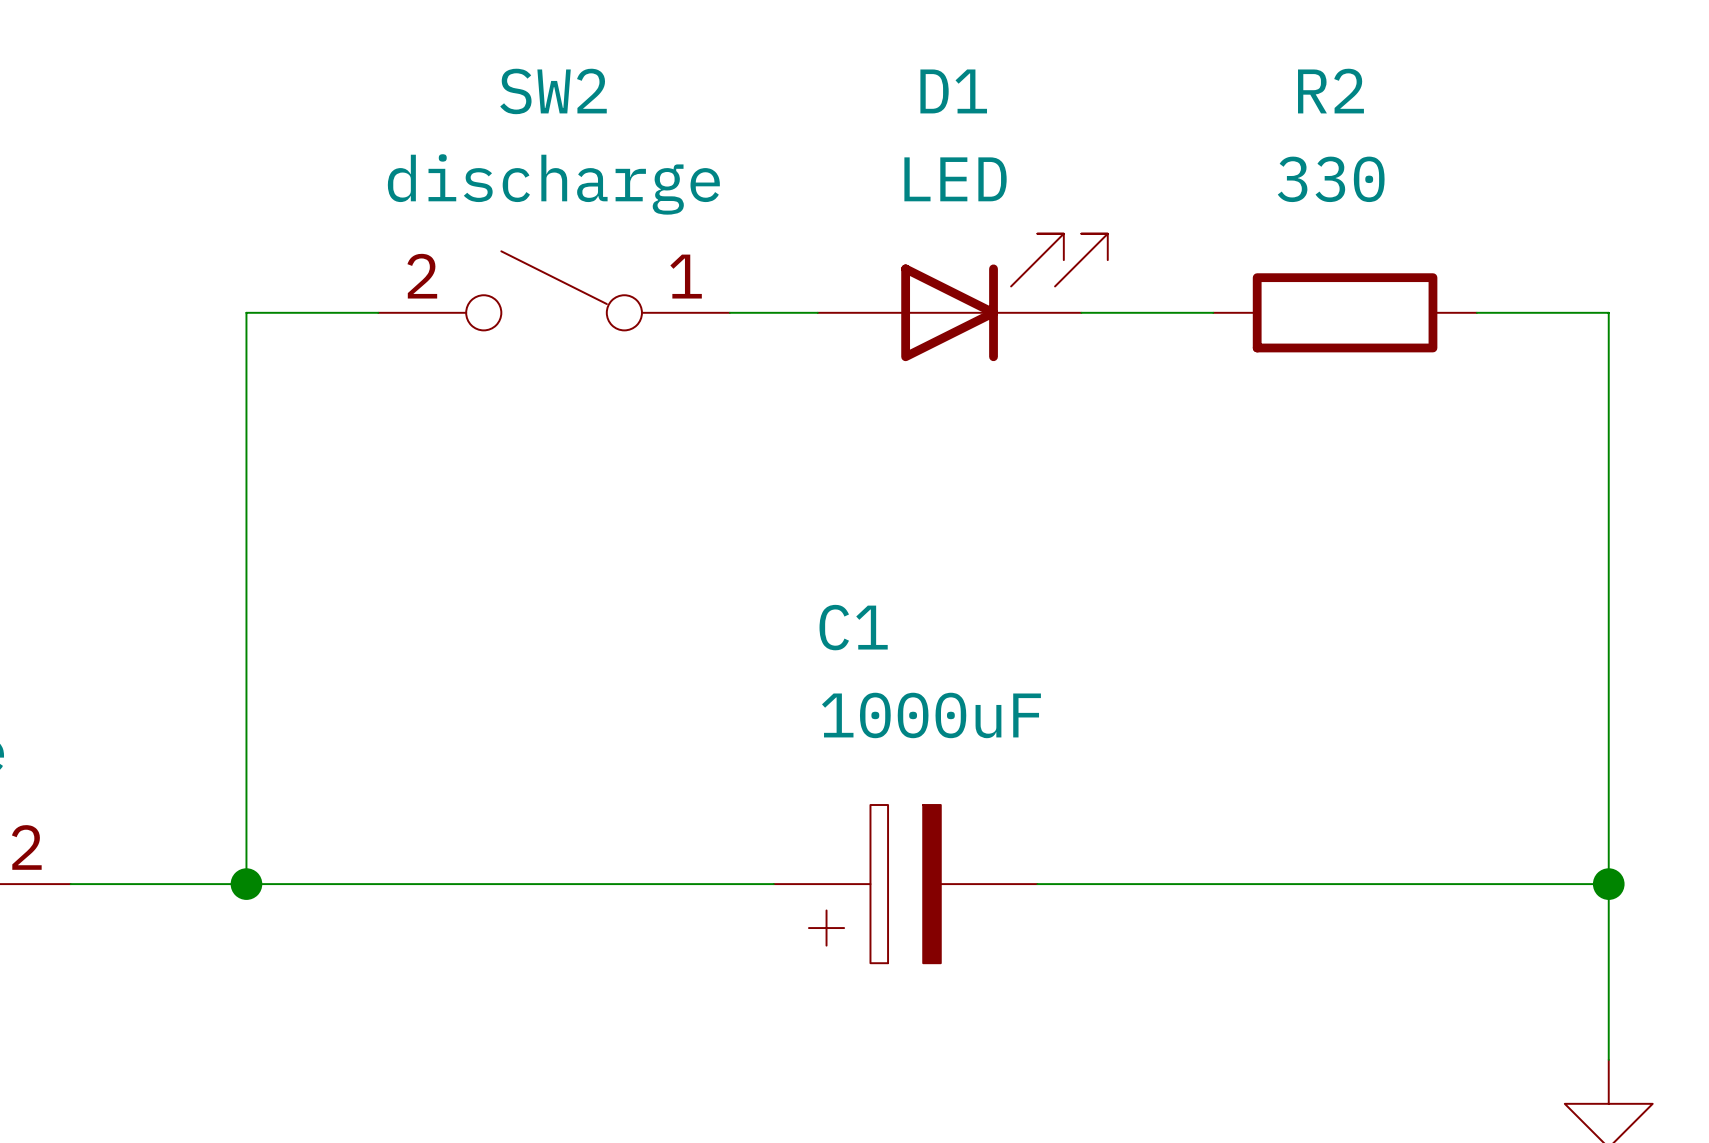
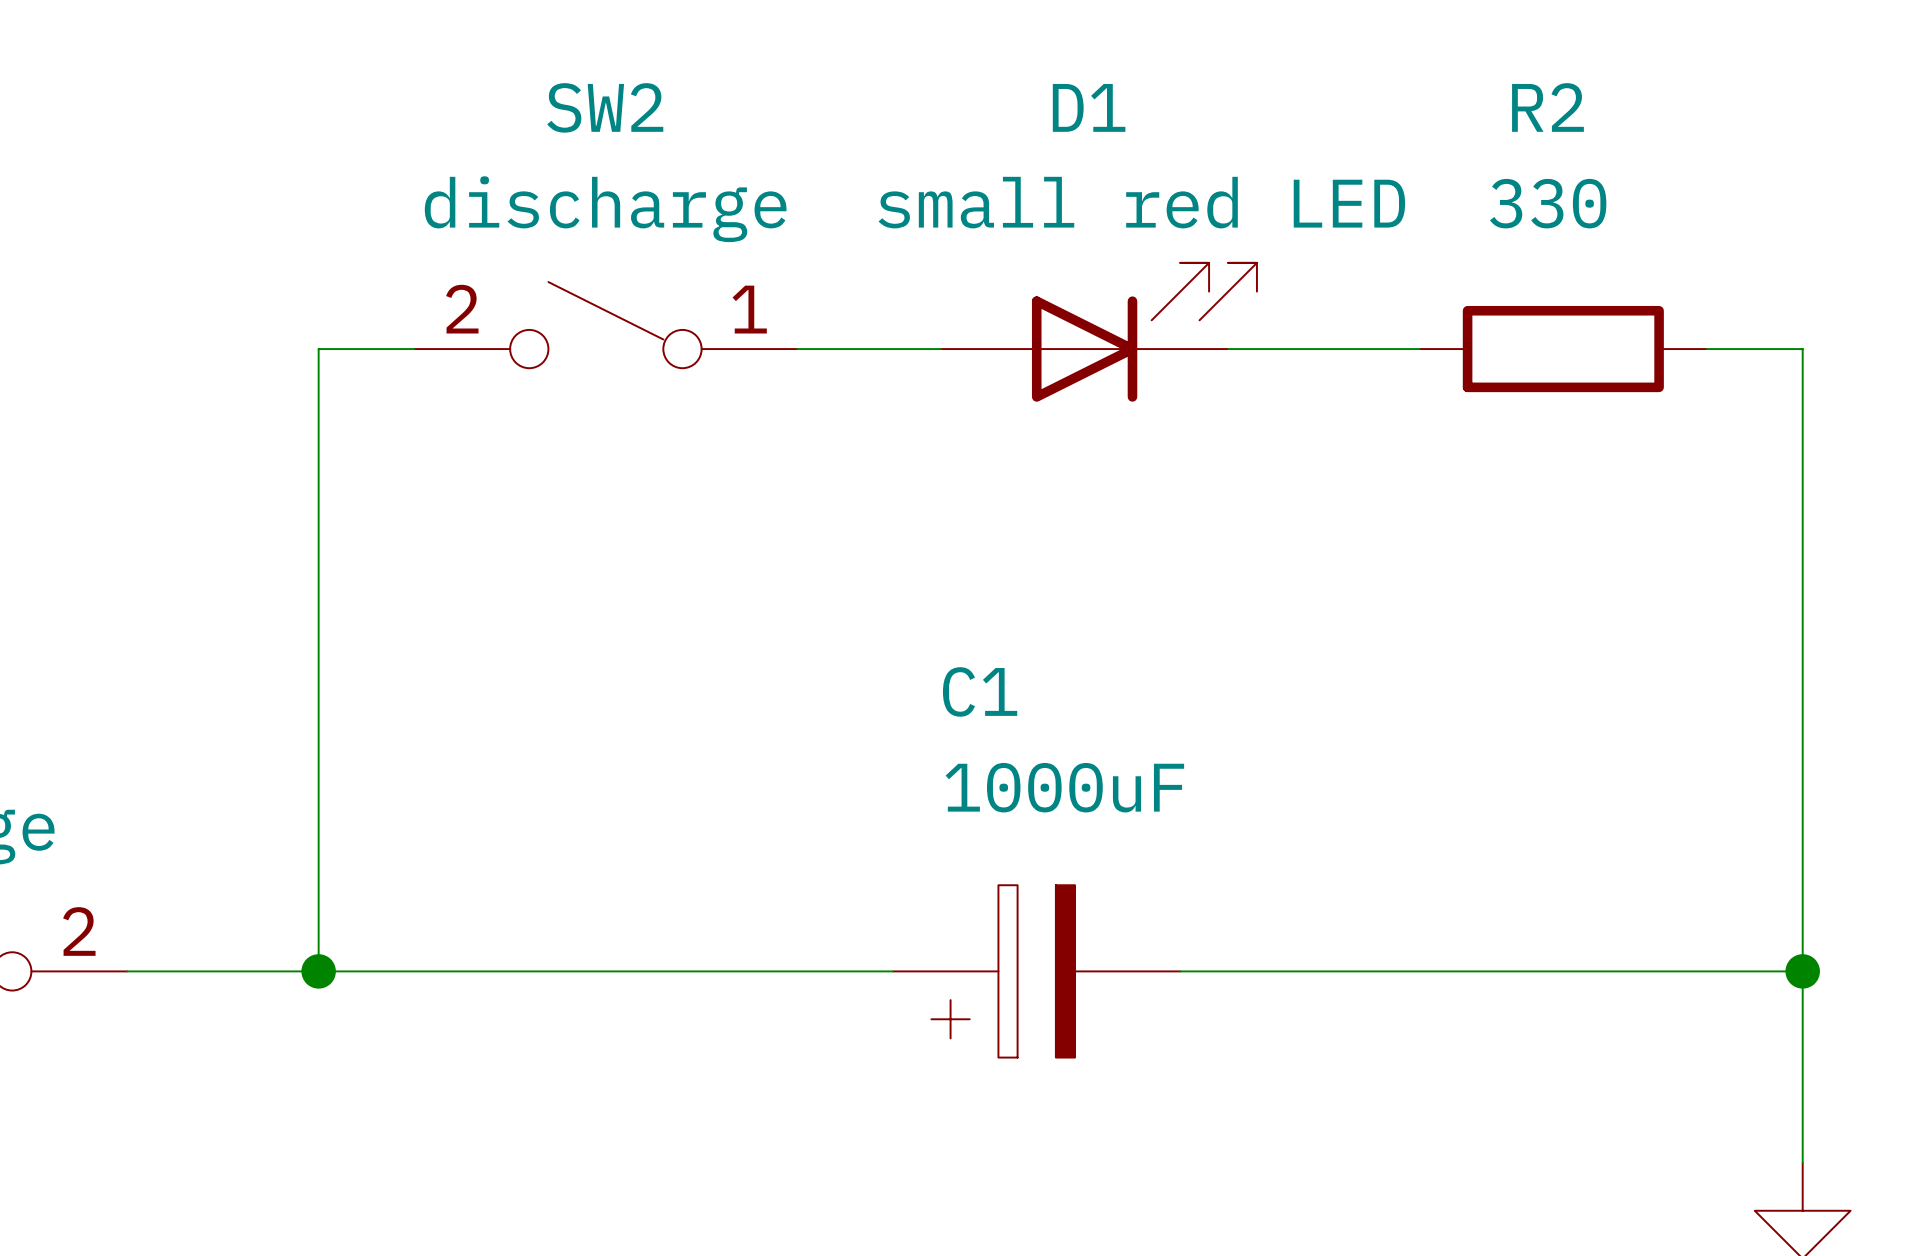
D1 value: LED (955, 179) -> small red LED (1141, 202)
SW2 position: (554, 290) -> (605, 325)
R2 position: (1345, 312) -> (1563, 349)

